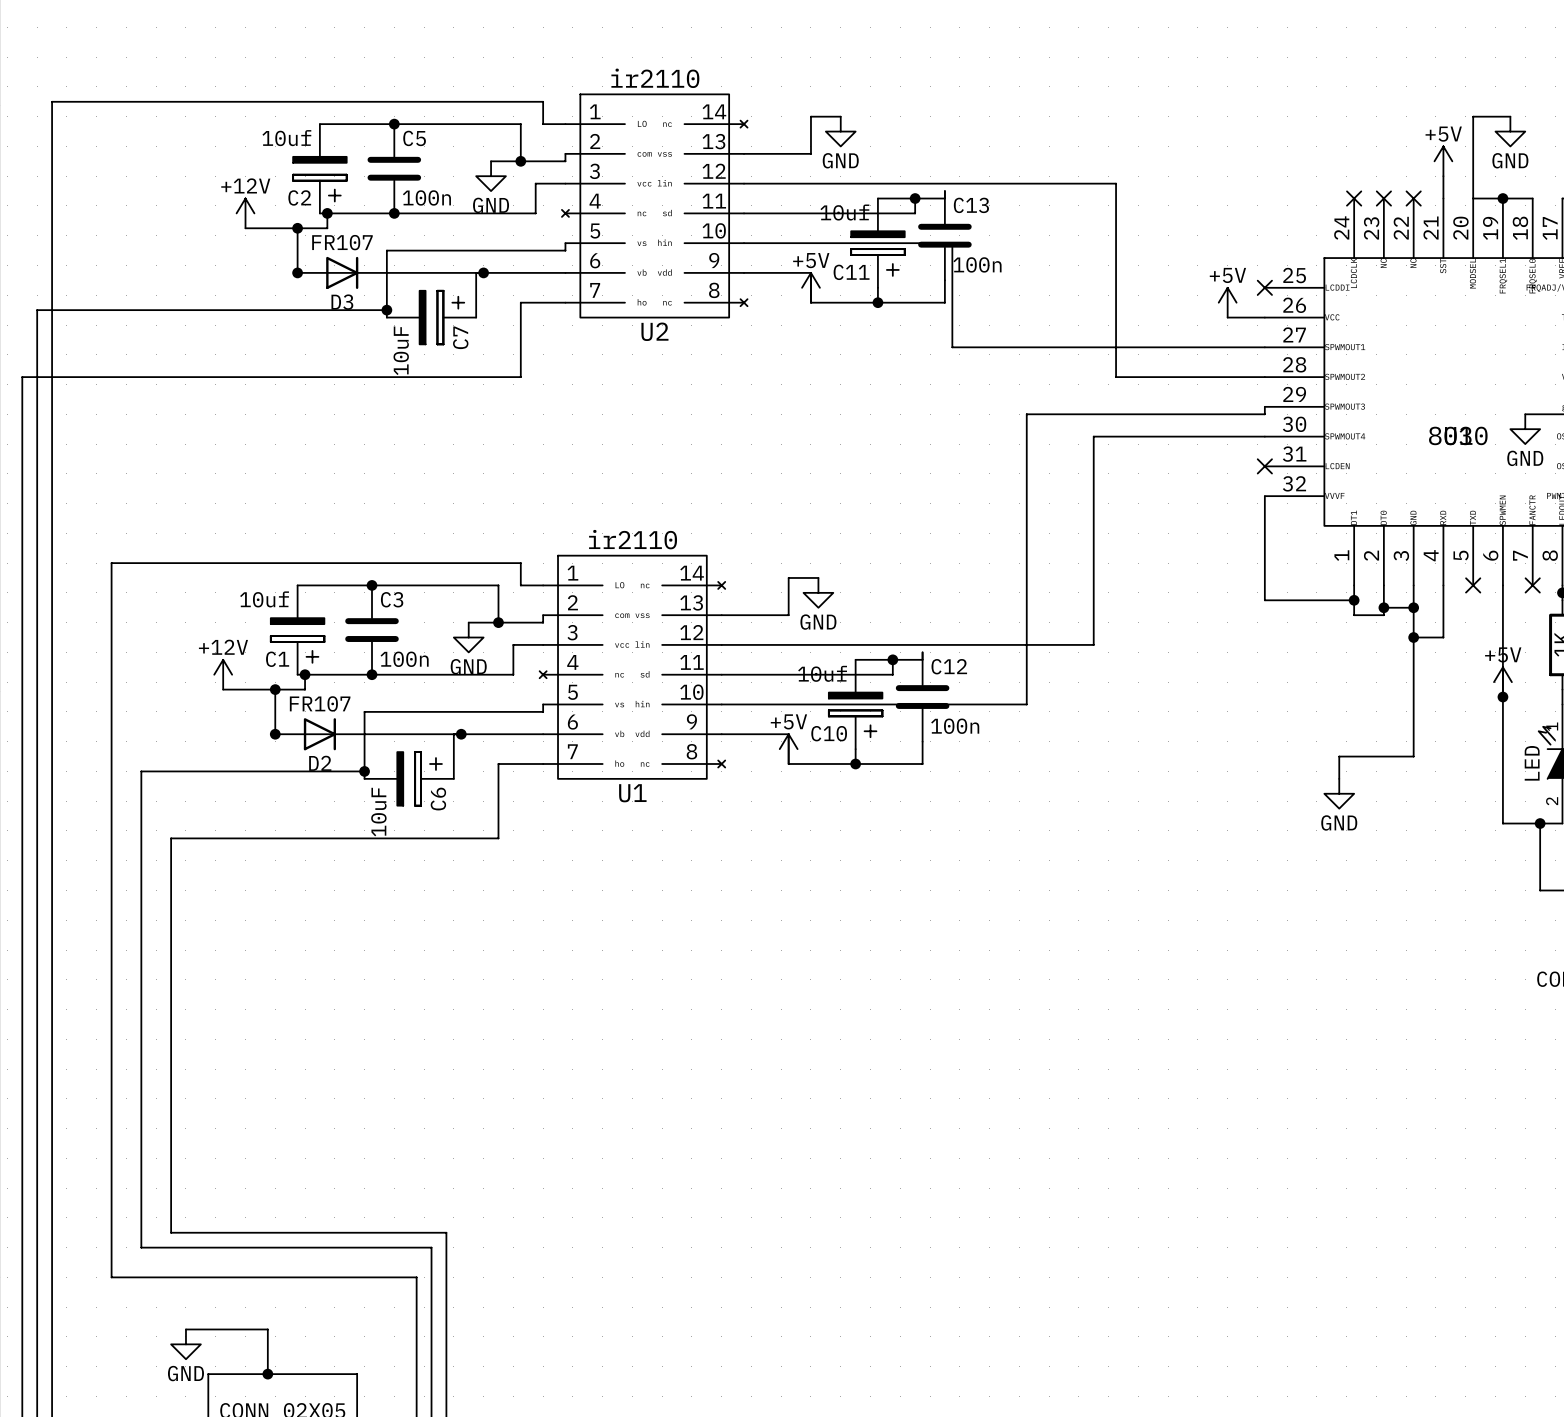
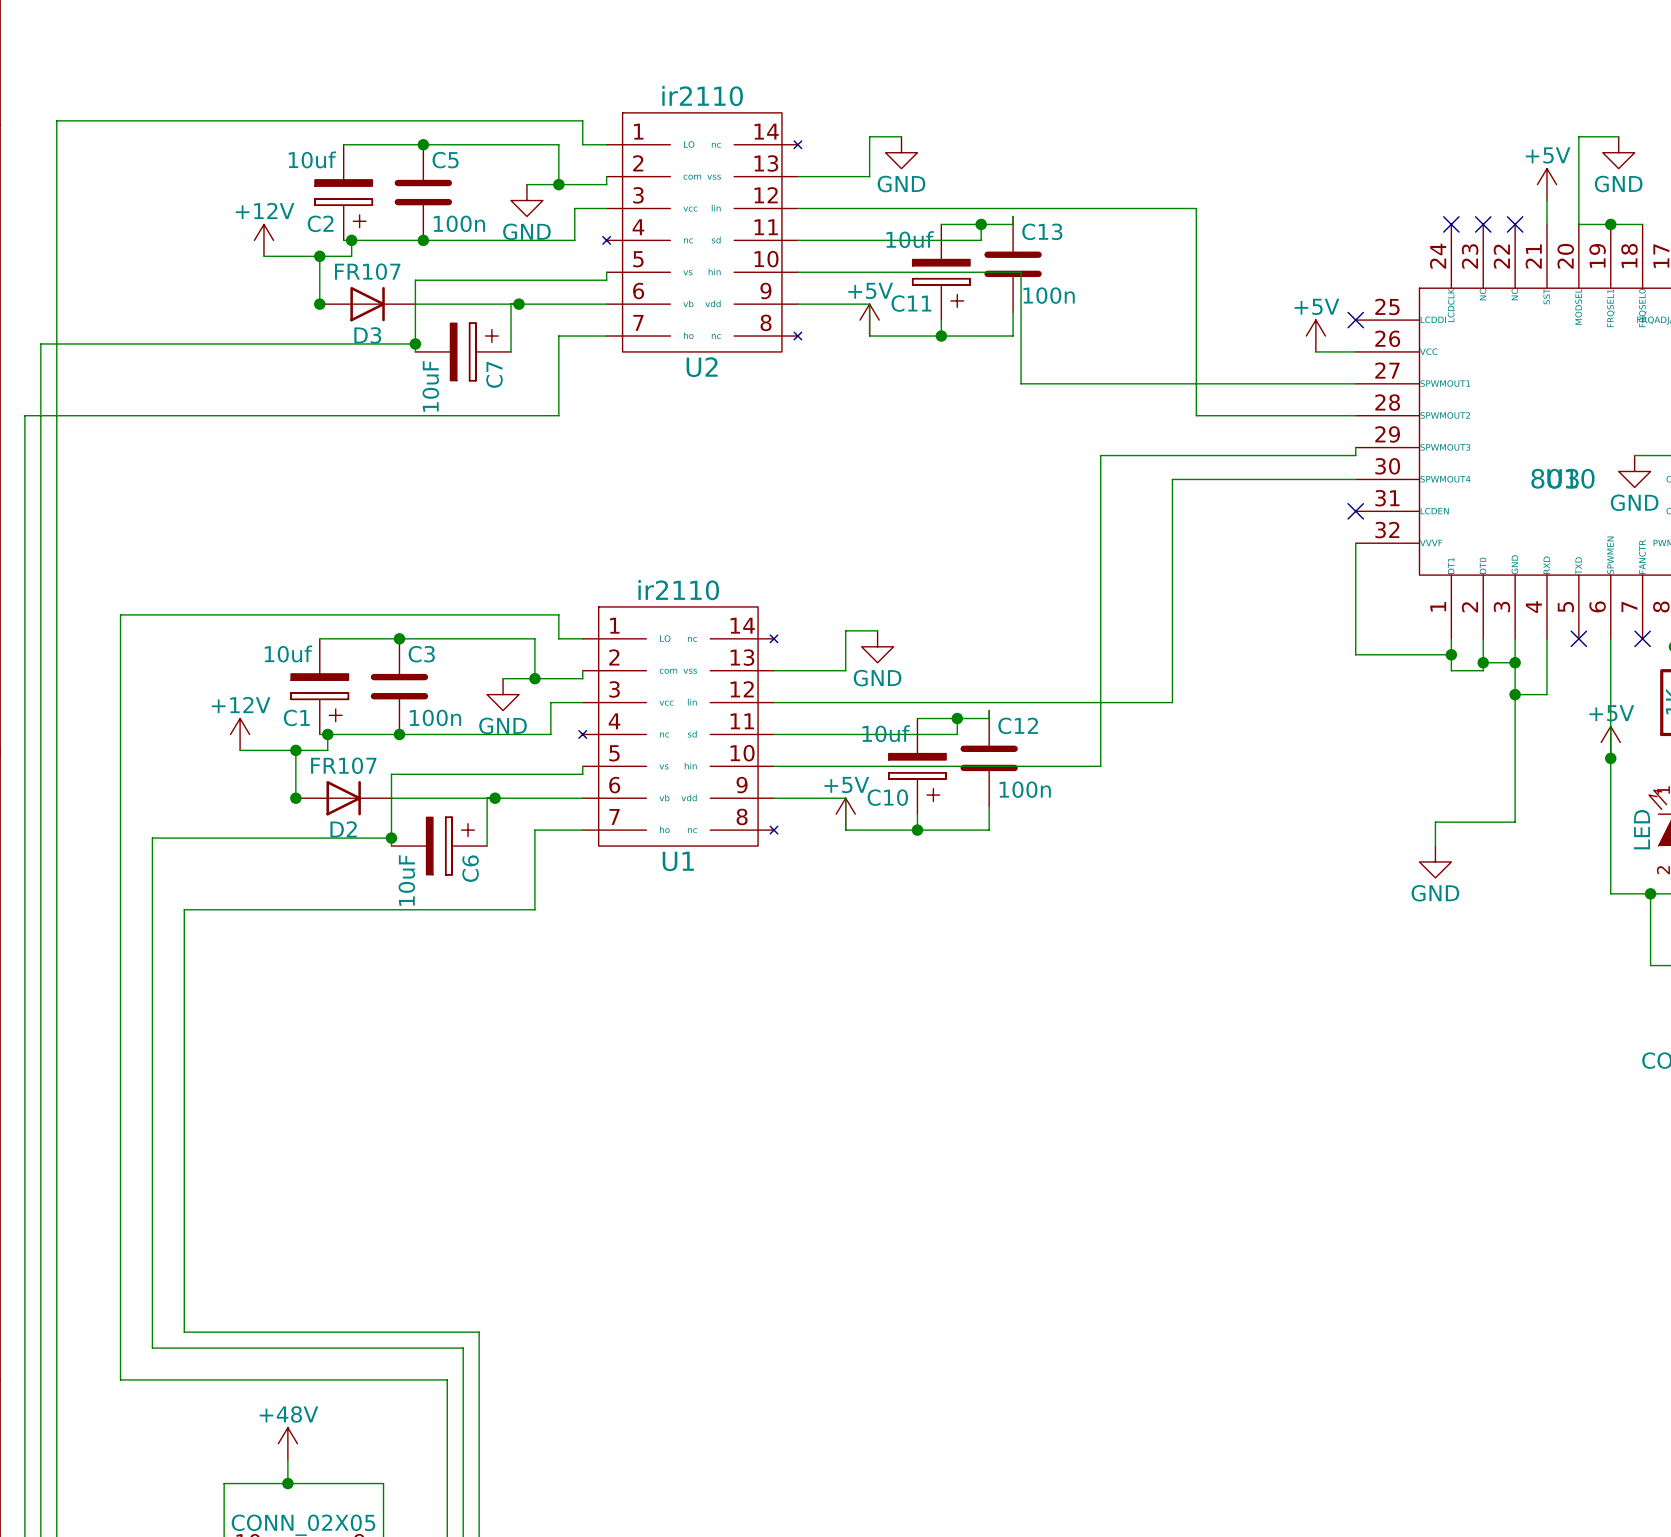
wire: (185, 1329) (267, 1329) (267, 1351) -> none
power symbol: none -> +48V (287, 1443)
power symbol: GND (185, 1344) -> none

